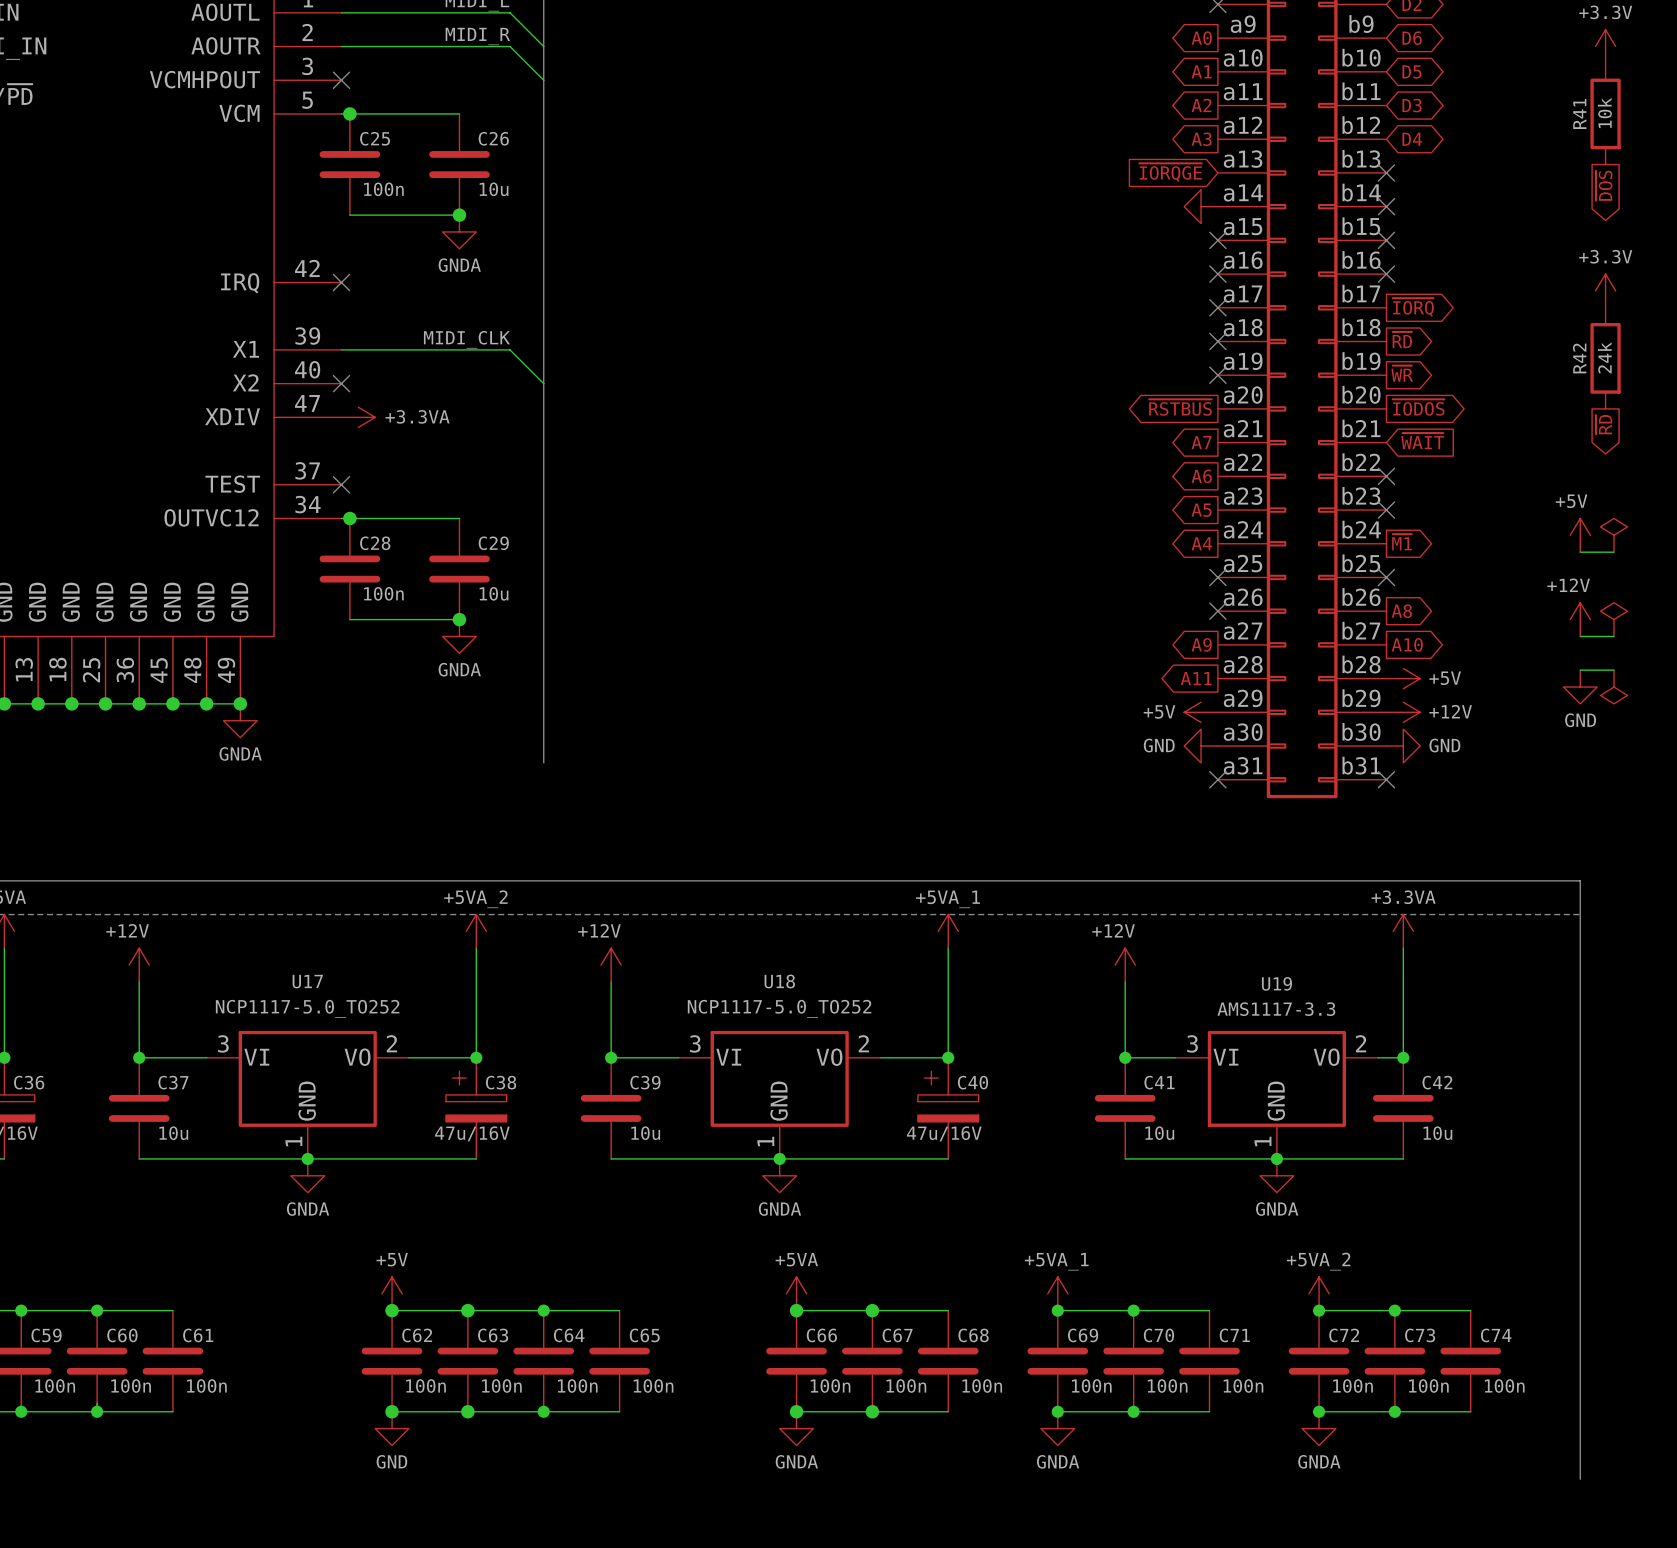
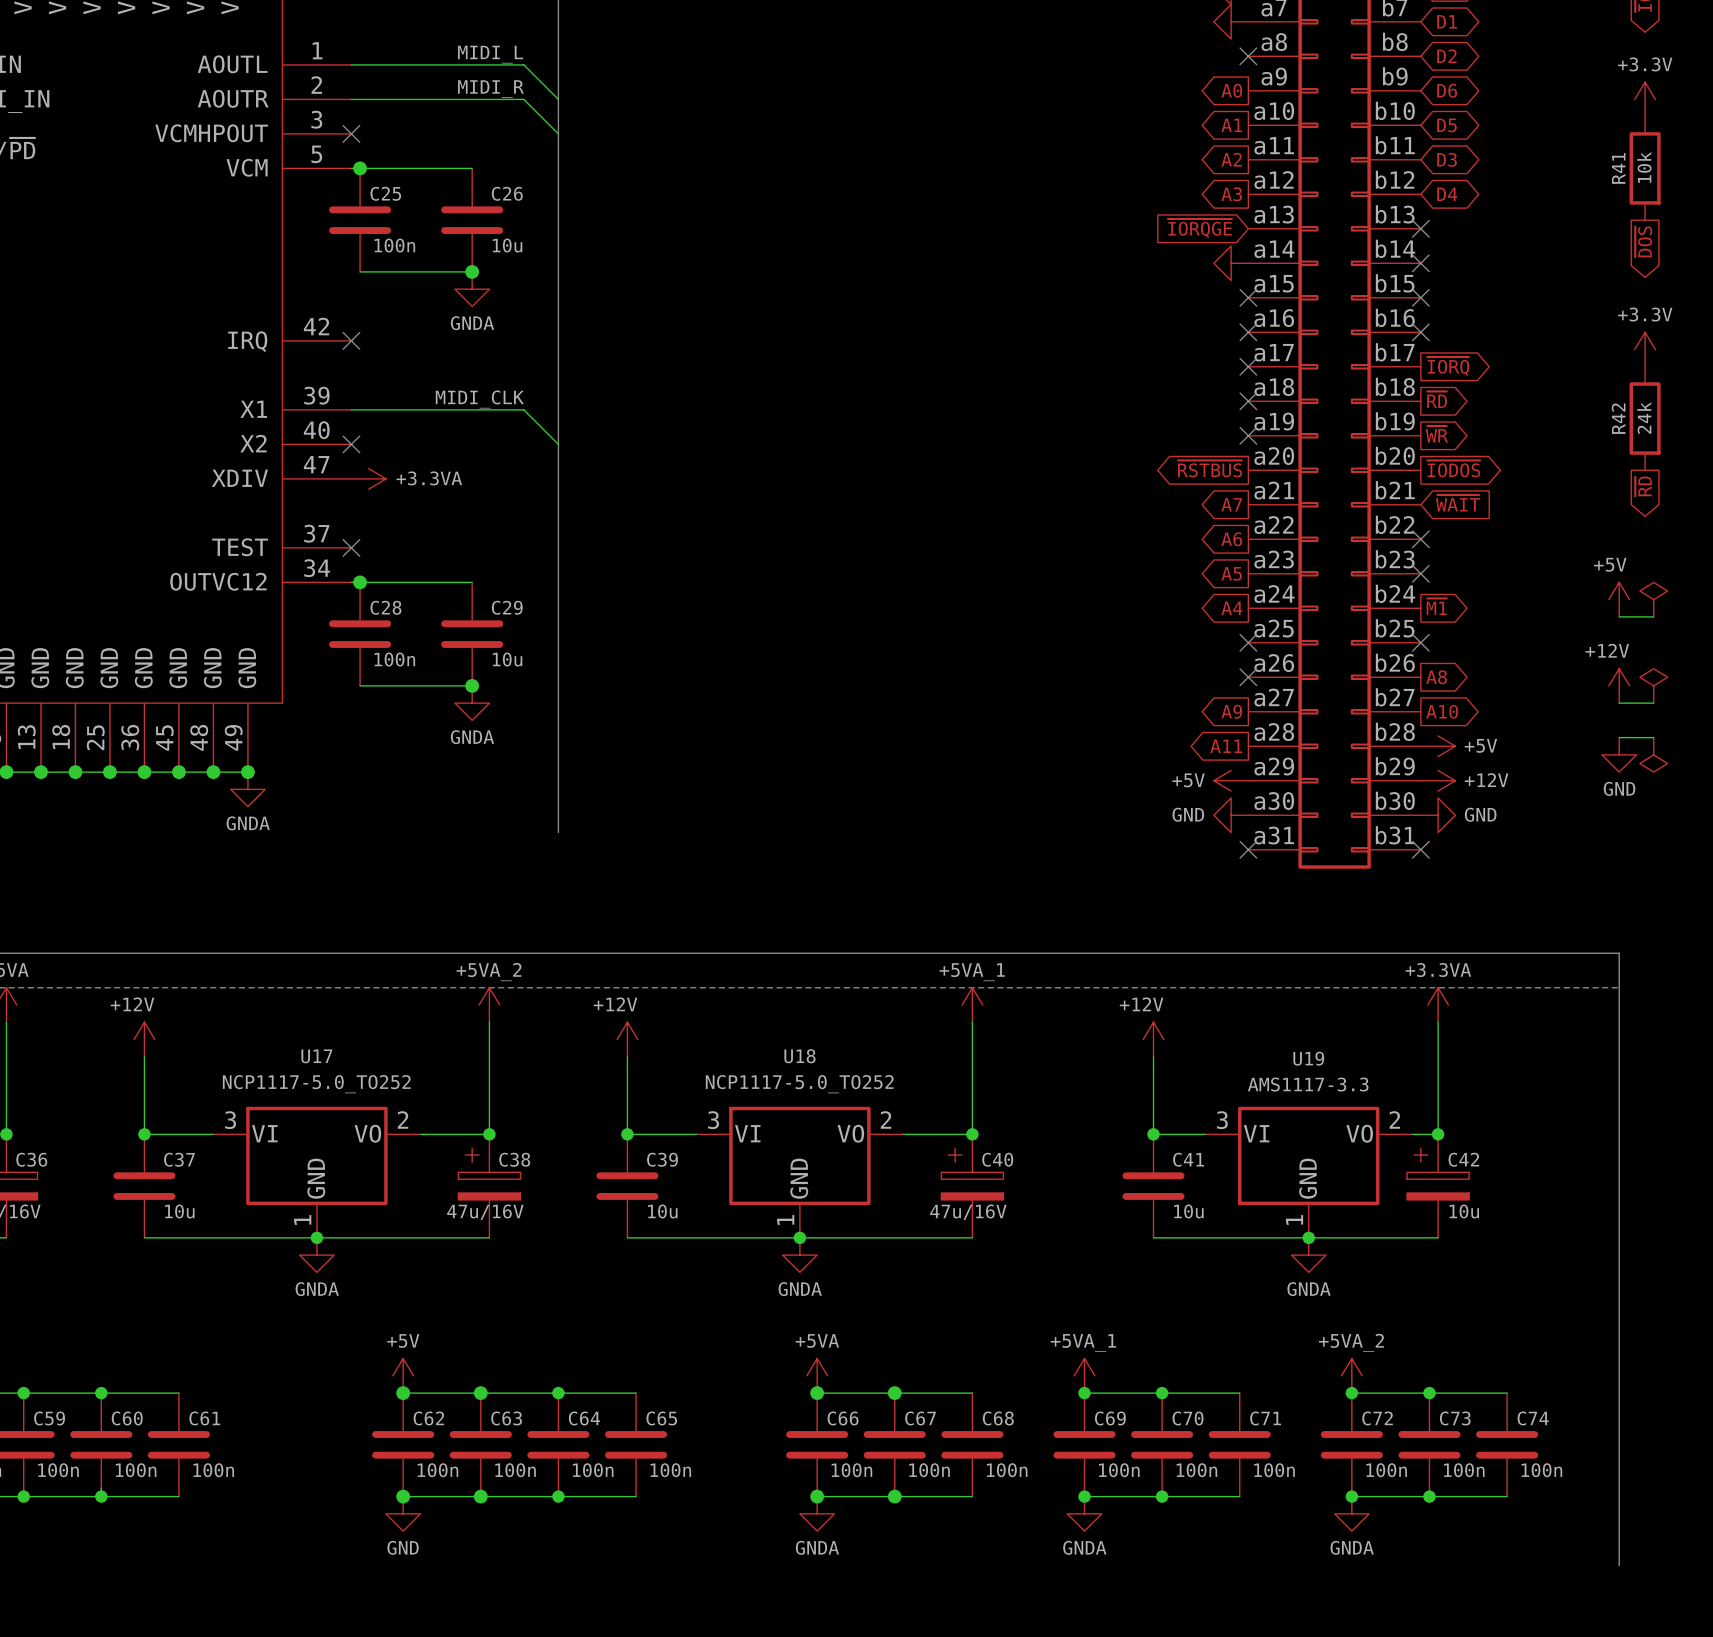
C42 symbol: [1372, 1057, 1434, 1159] -> [1407, 1134, 1470, 1238]

